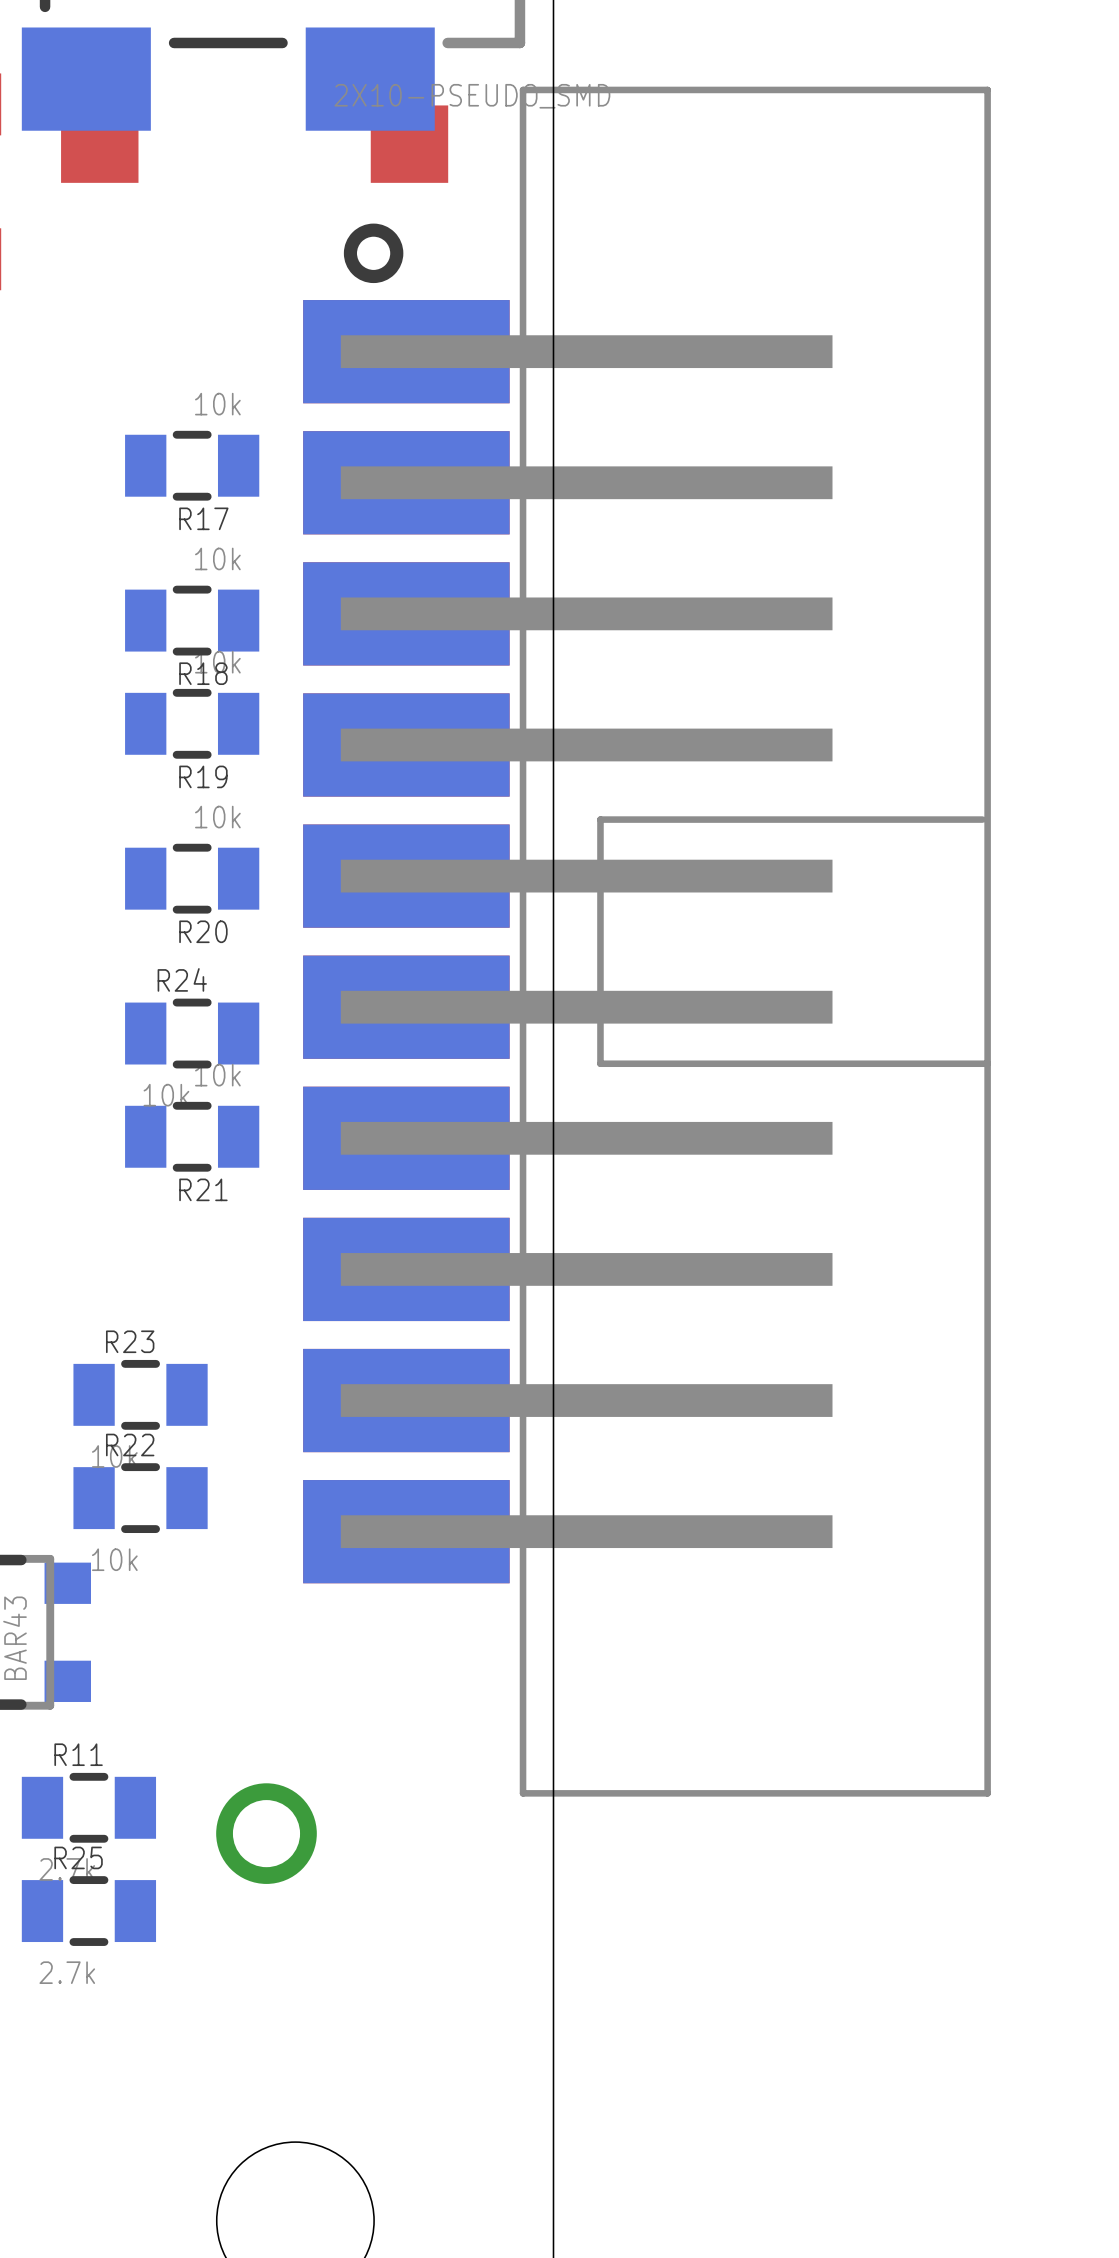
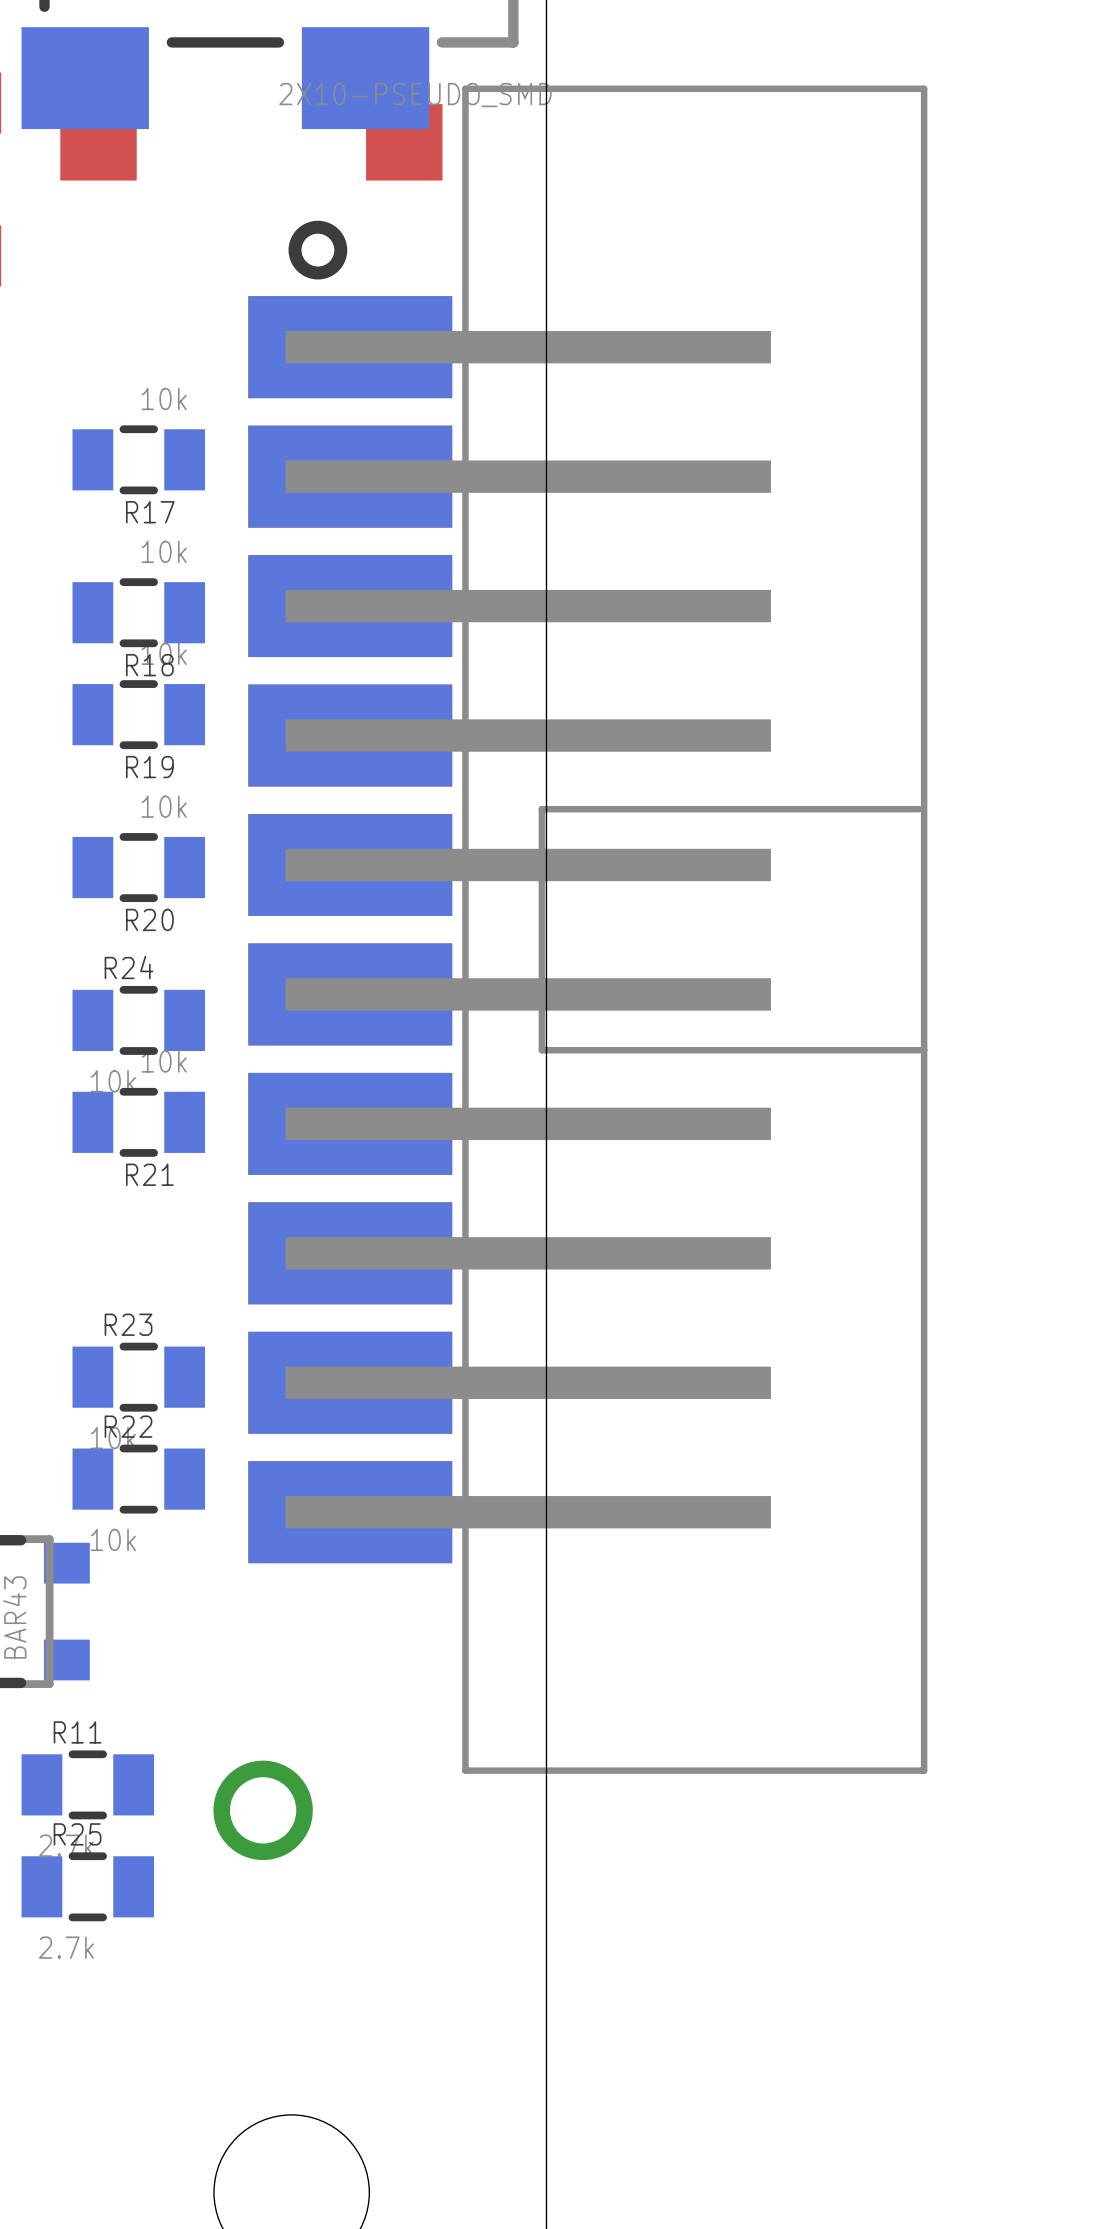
R17 position: (192, 465) -> (138, 459)
R18 position: (192, 620) -> (138, 612)
R19 position: (192, 723) -> (138, 714)
R20 position: (192, 878) -> (138, 867)
part position: (647, 941) -> (587, 929)
R24 position: (192, 1033) -> (138, 1020)
R21 position: (192, 1136) -> (138, 1122)

